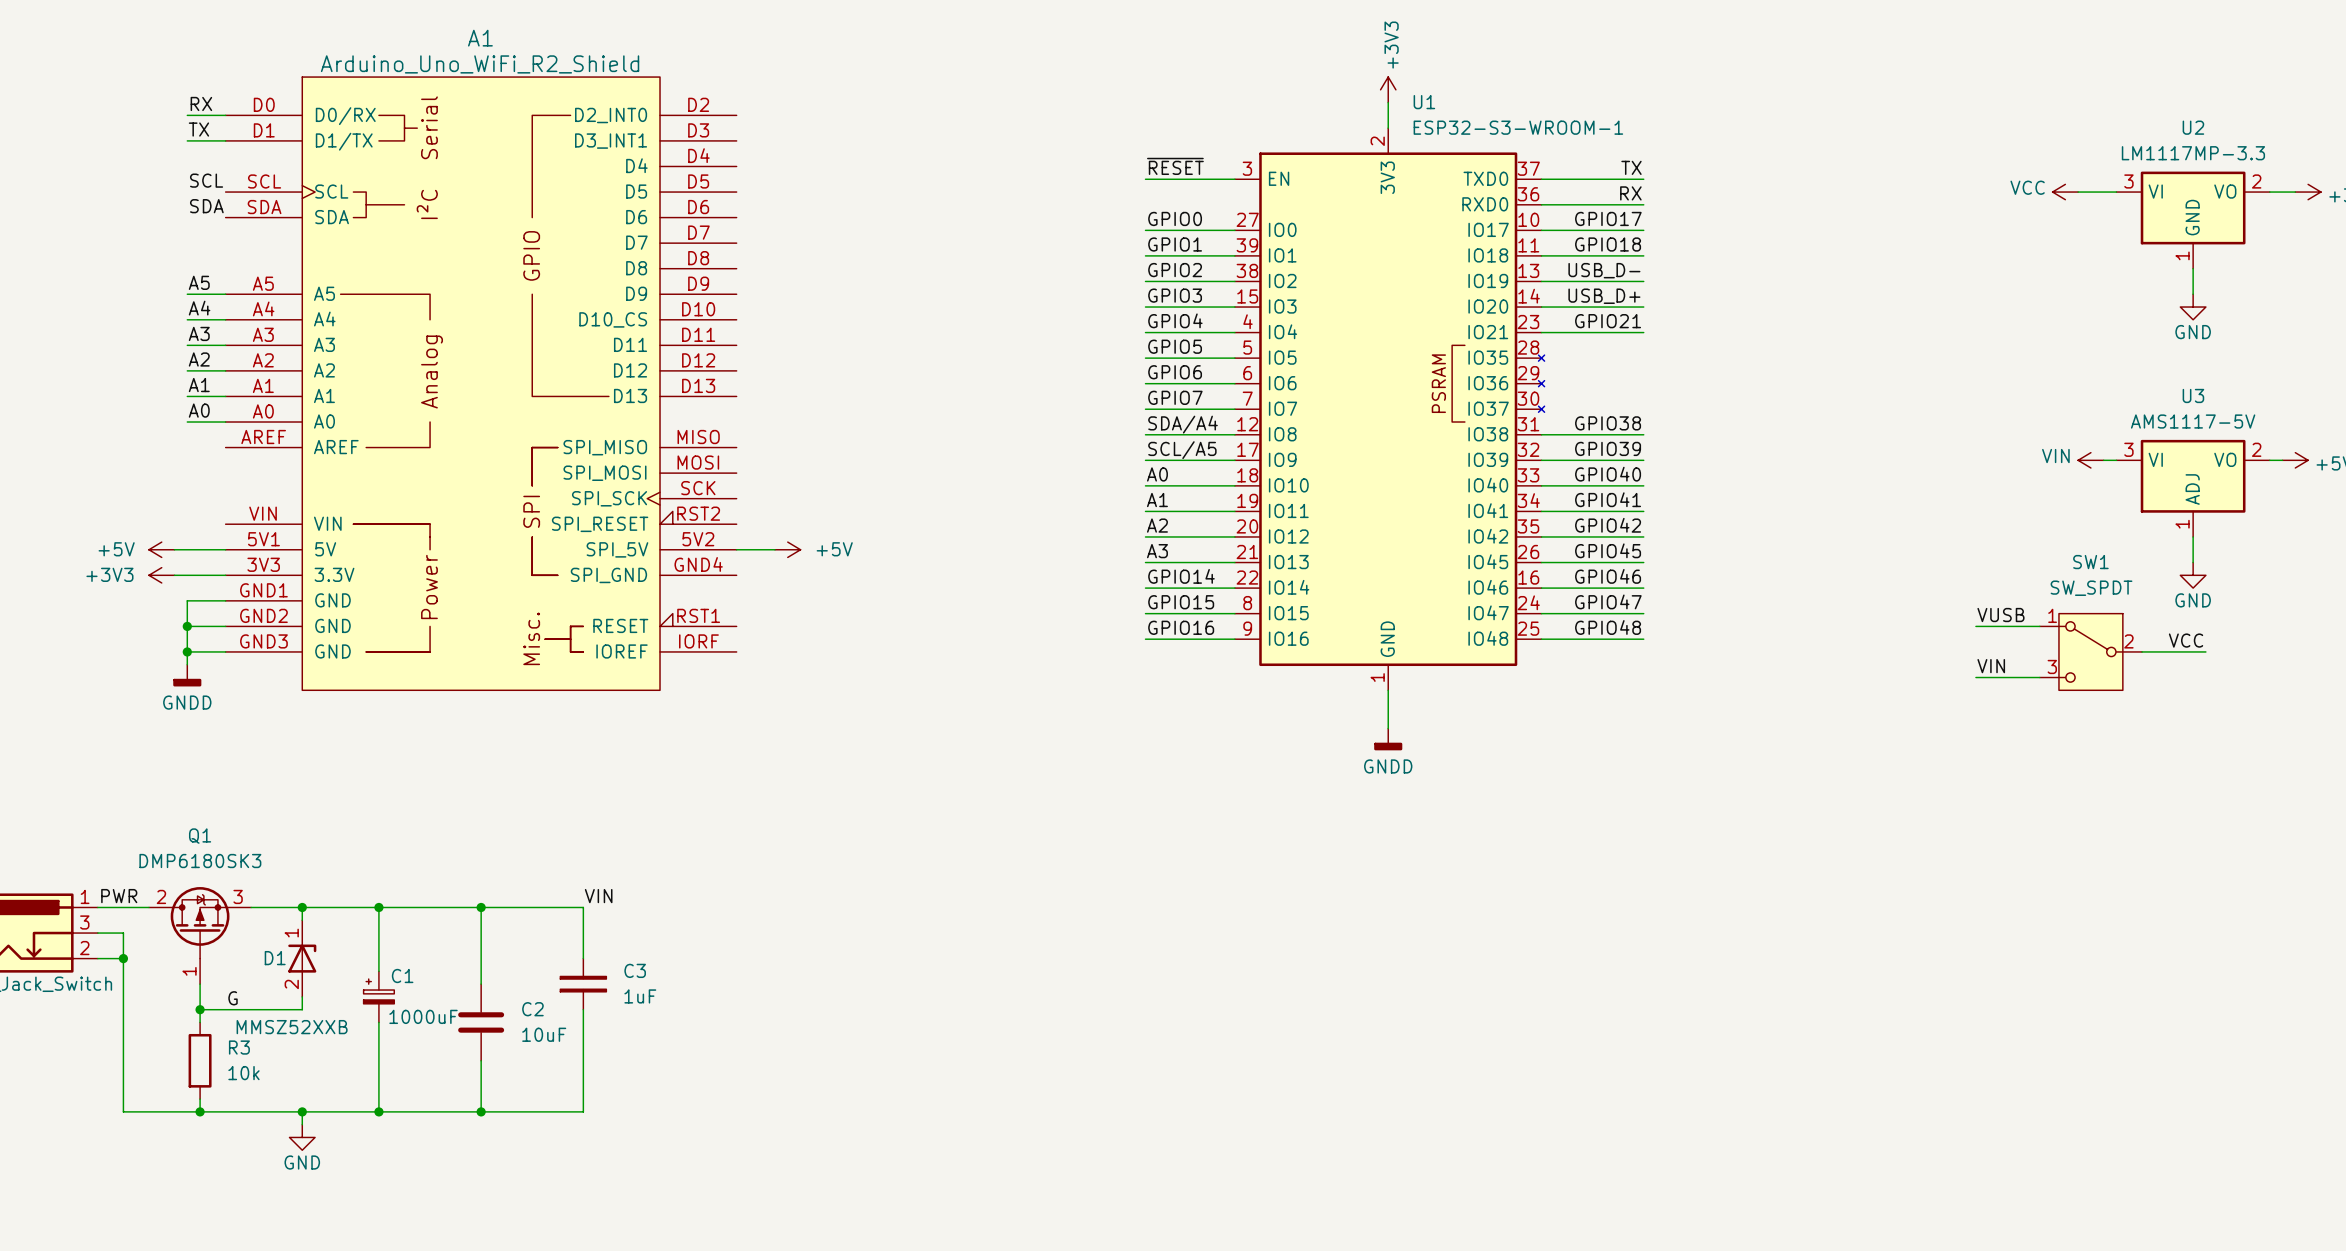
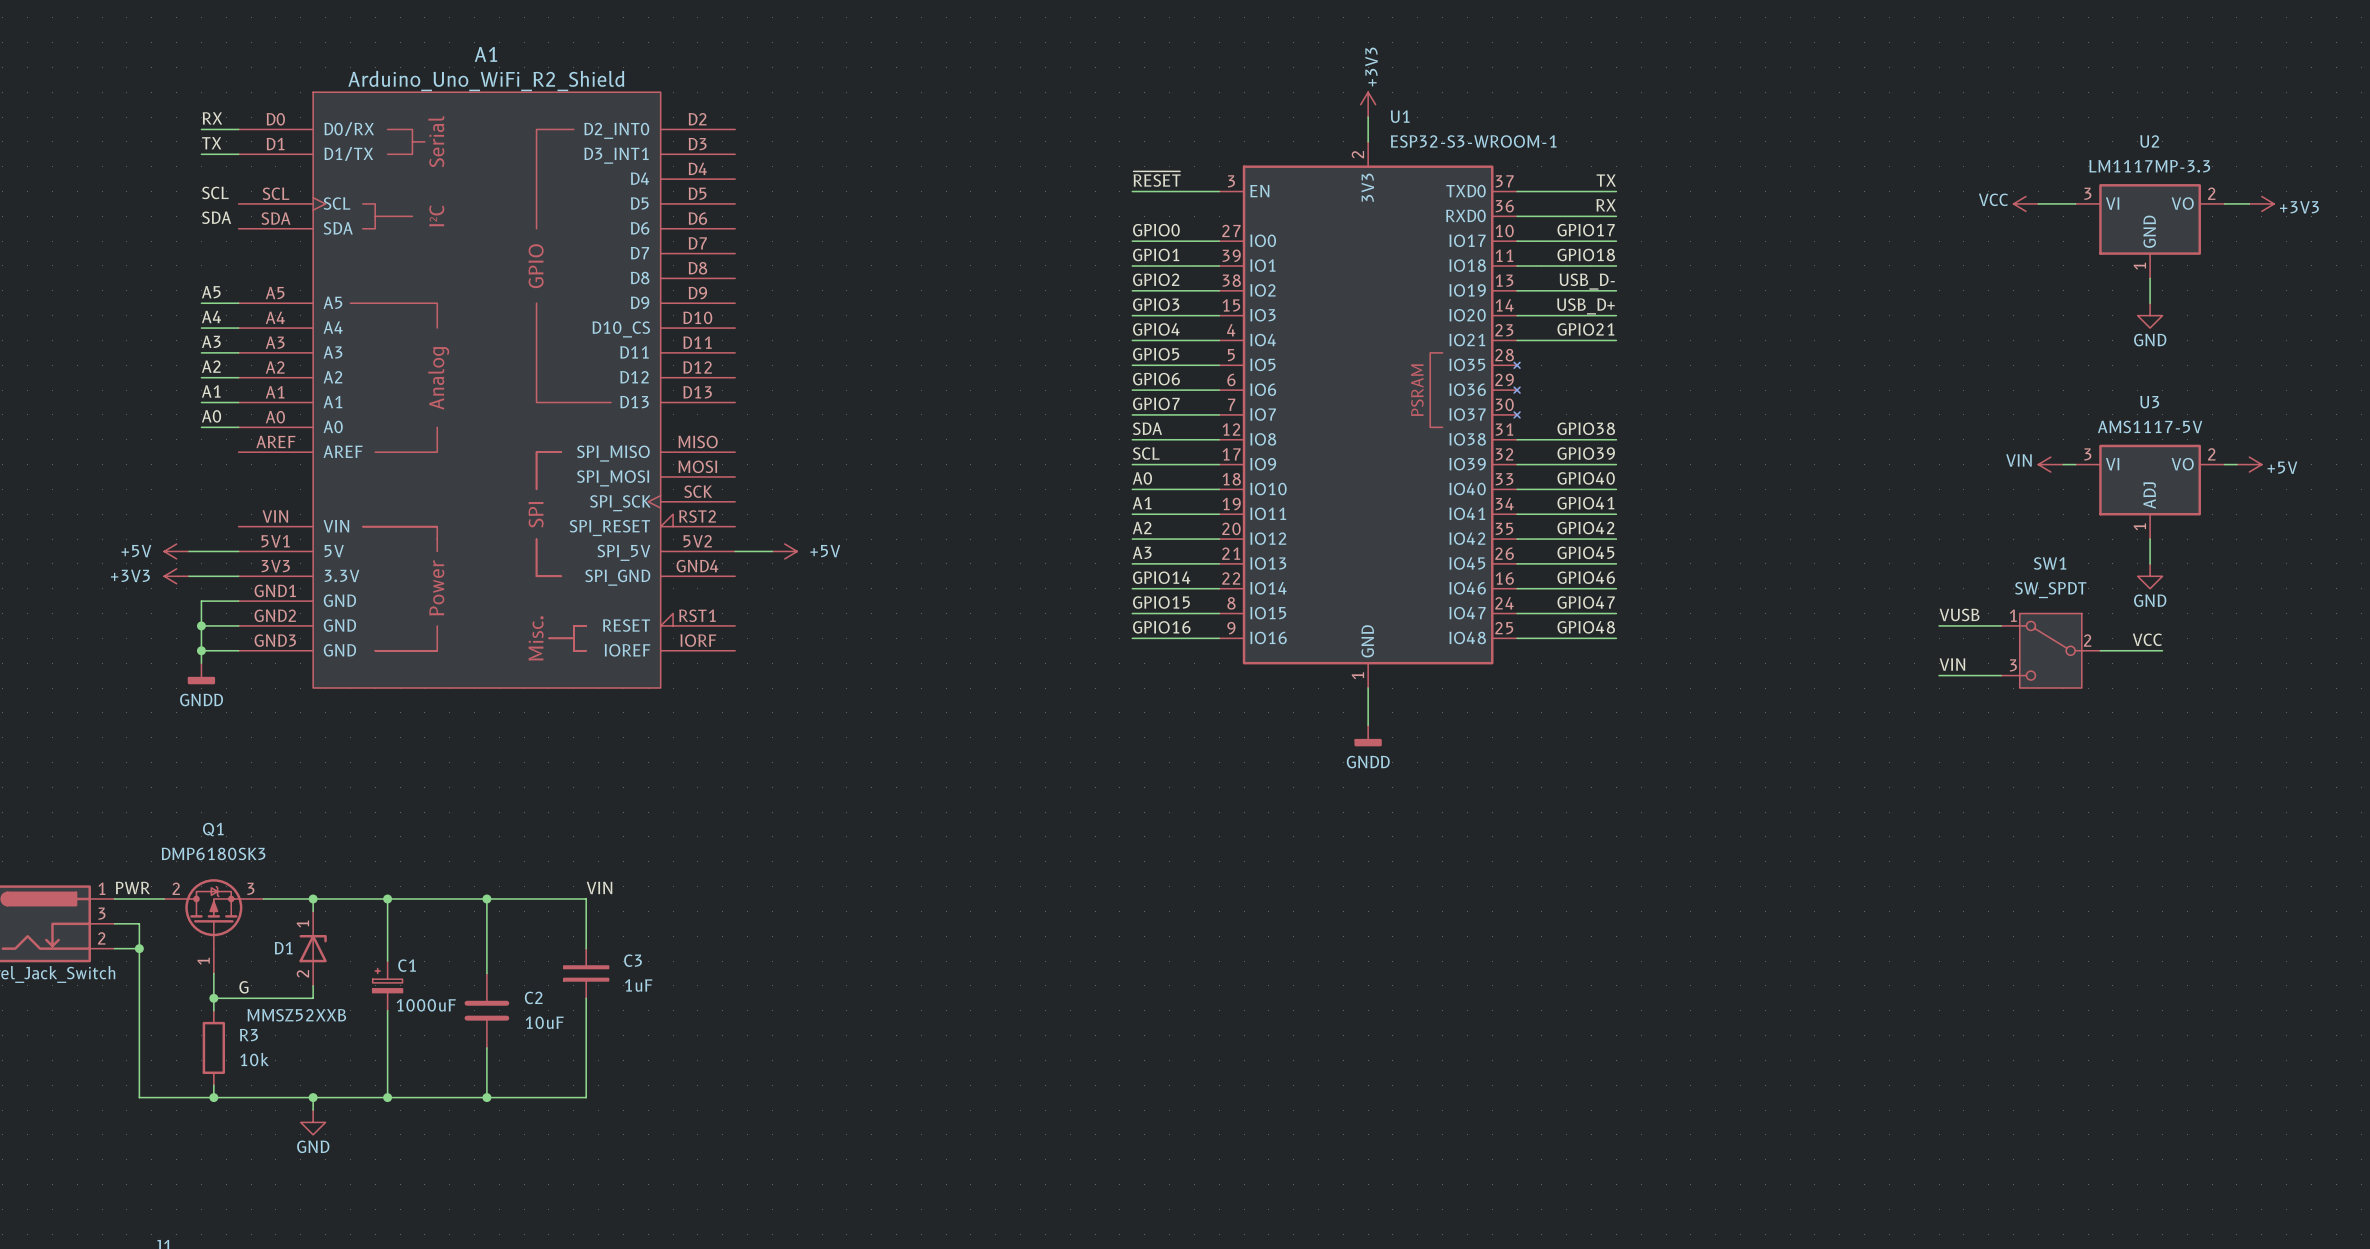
label: SDA/A4 (1183, 424) -> SDA (1147, 428)
label: SCL/A5 (1182, 450) -> SCL (1146, 453)

